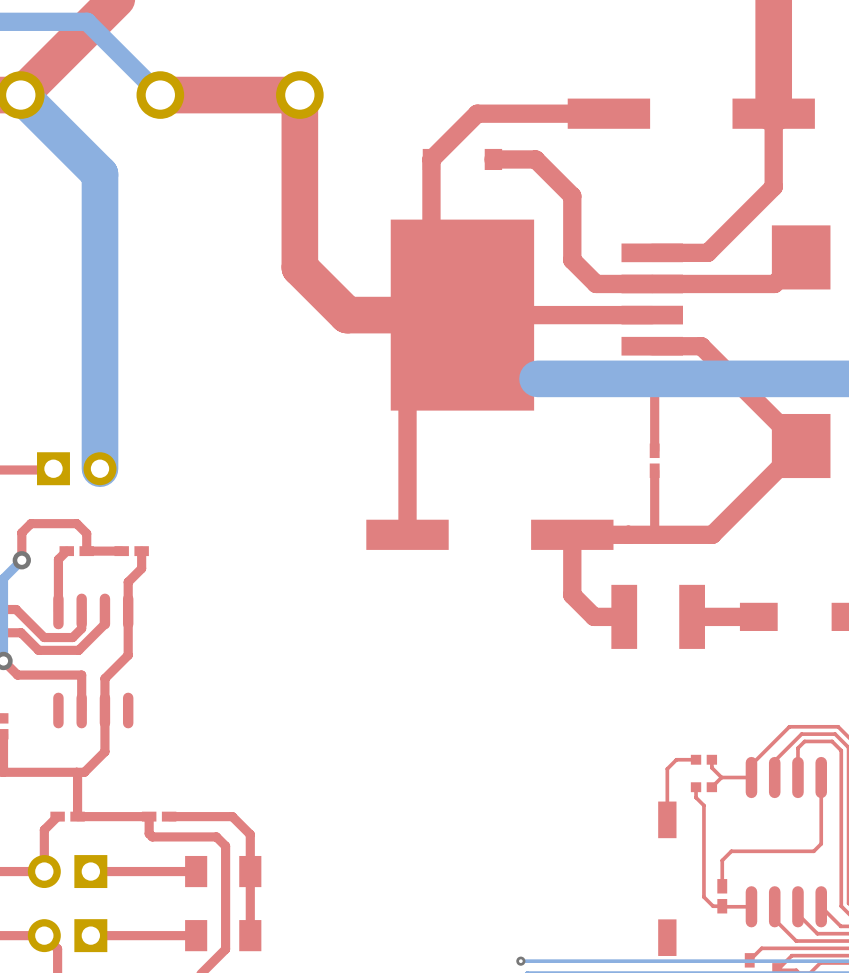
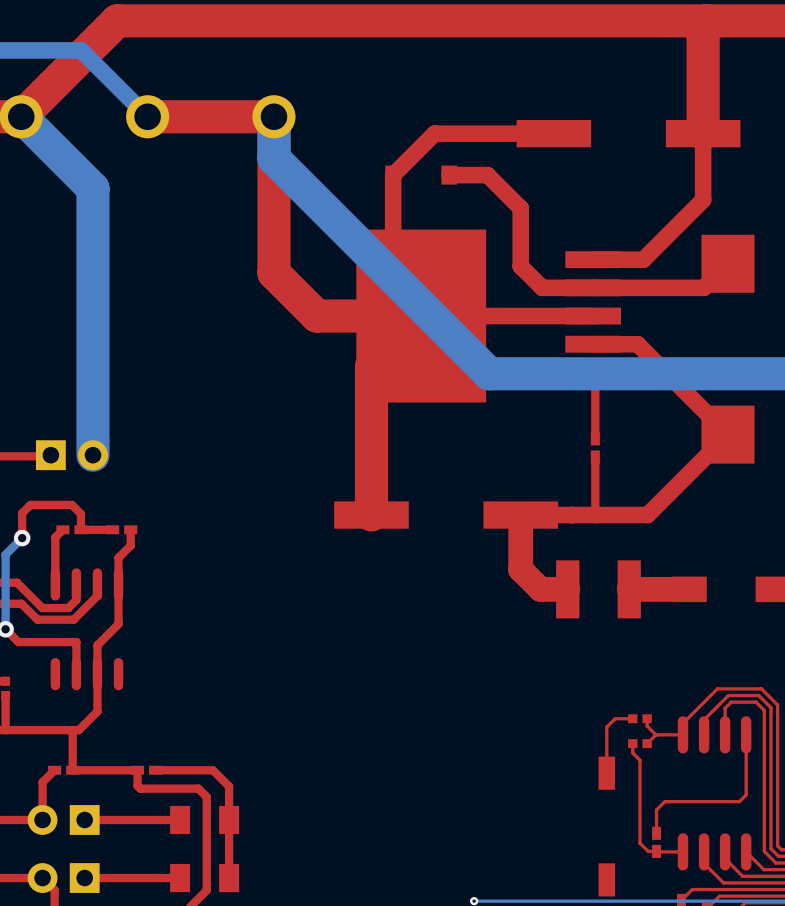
bottom track: none -> (273, 116) (273, 158) (489, 373)
top track width: thin (407, 370) (407, 534) -> thick (371, 365) (371, 515)
top track width: thin (572, 534) (572, 595) (594, 616) (624, 616) -> thick (520, 515) (520, 569) (540, 589) (567, 589)
top track width: thin (758, 616) (692, 616) -> thick (689, 589) (629, 589)

